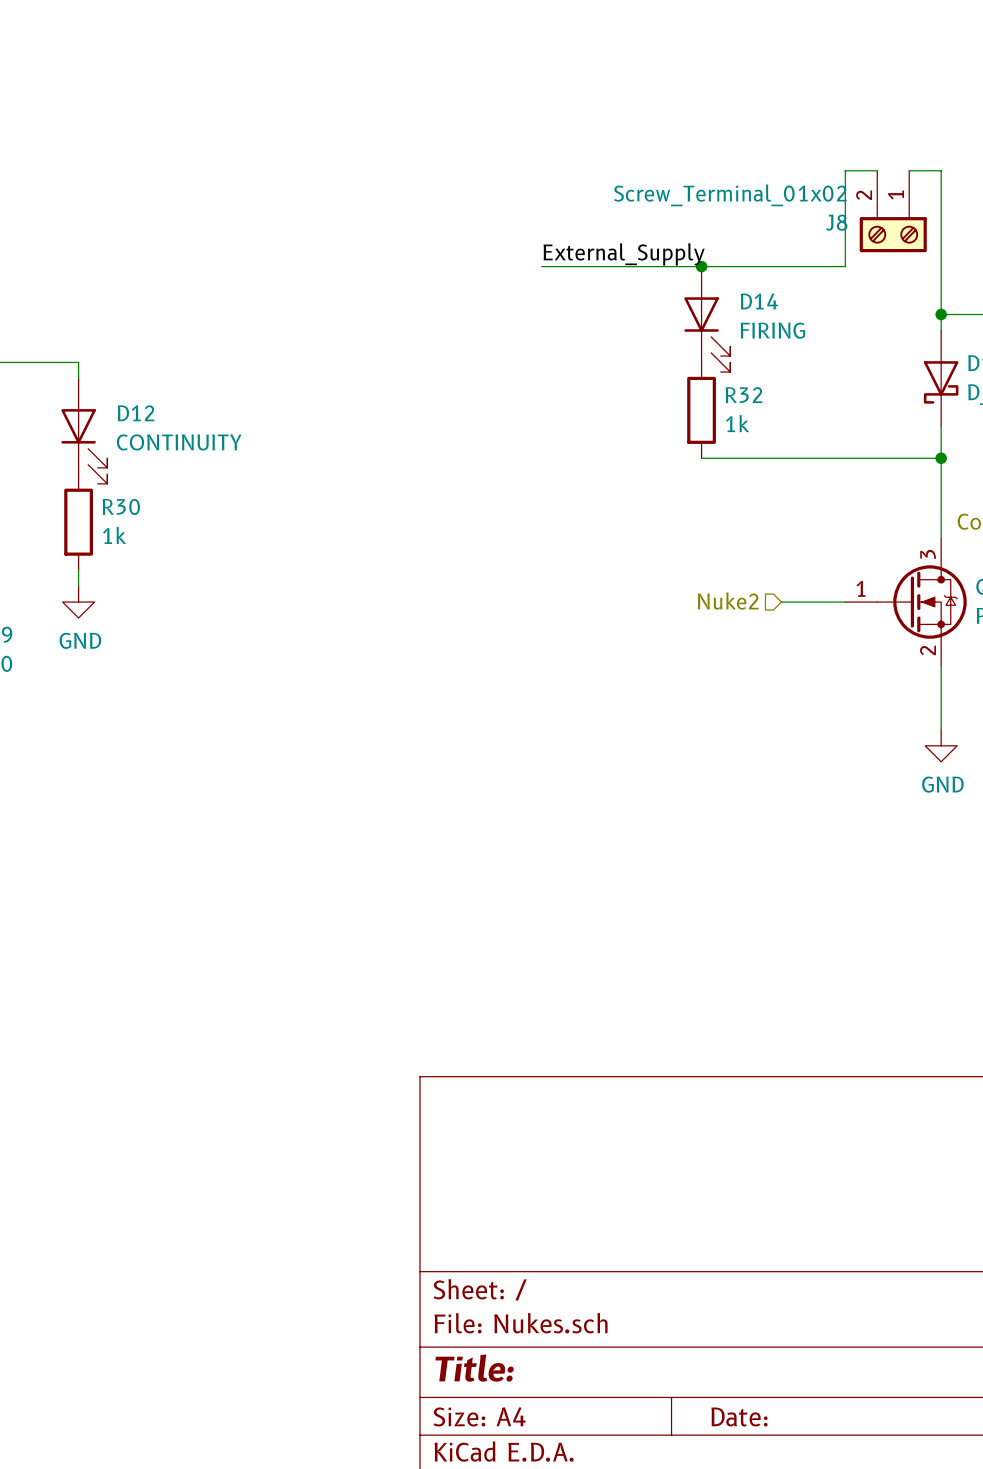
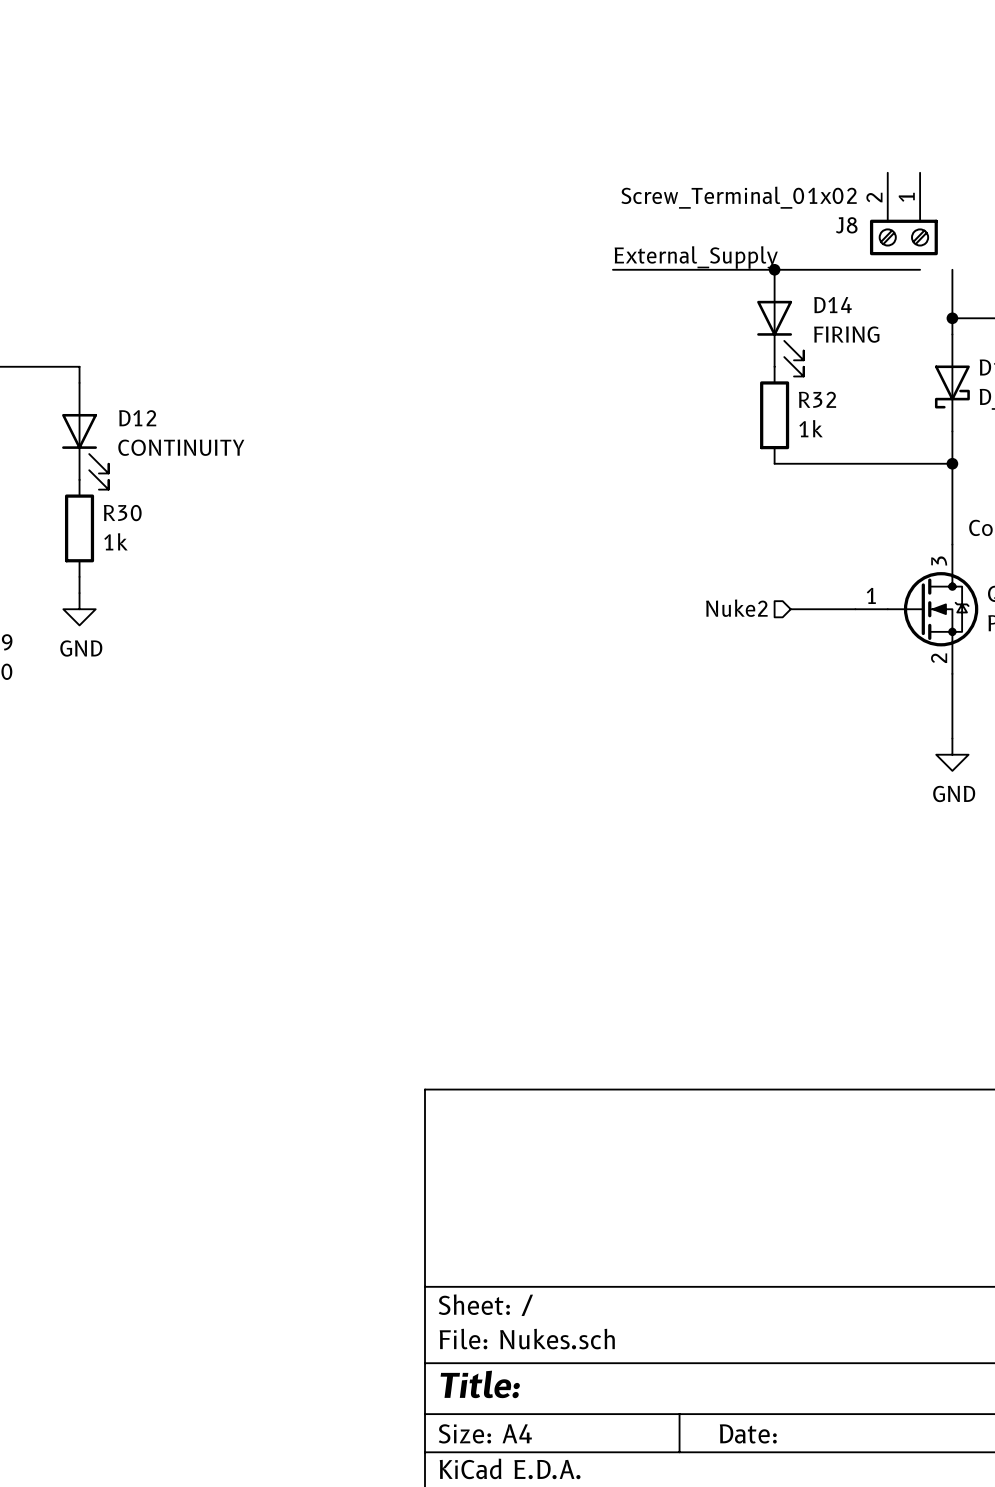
wire: (877, 170) (845, 170) (845, 266) -> (920, 269) (855, 269)
wire: (909, 170) (941, 170) (941, 266) -> none
label position: External_Supply (624, 254) -> External_Supply (696, 257)
wire: (541, 266) (605, 266) -> none
junction position: (701, 266) -> (774, 269)
D14 position: (707, 319) -> (780, 323)
R32 position: (701, 410) -> (774, 415)
wire: (701, 458) (765, 458) -> none

